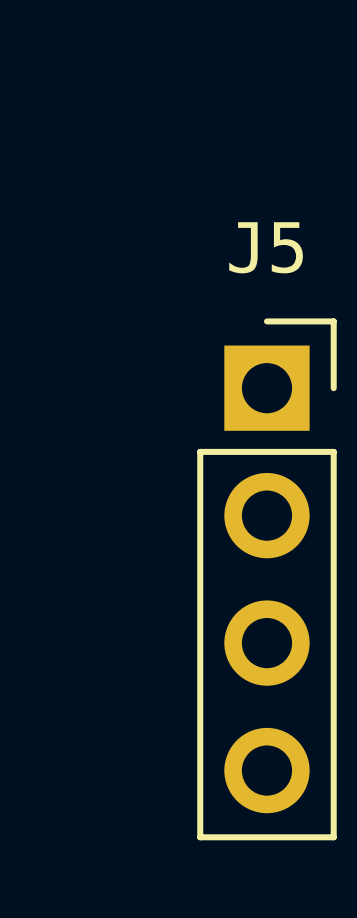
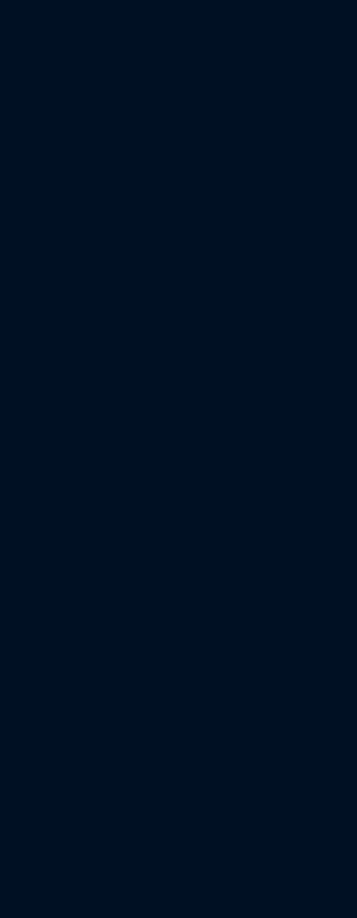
J5: (266, 579) -> none

